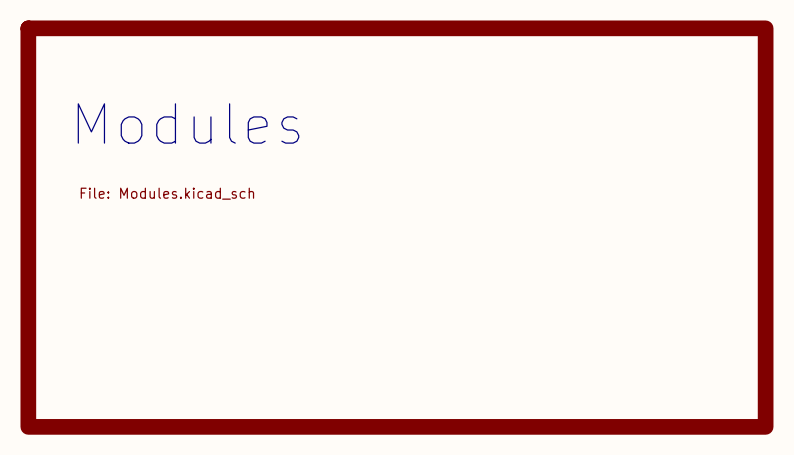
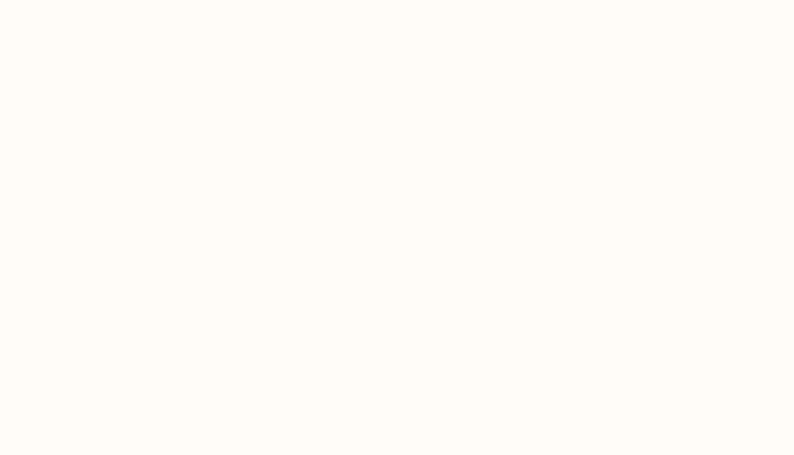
sheet Modules: File: Modules.kicad_sch (396, 227) -> none

